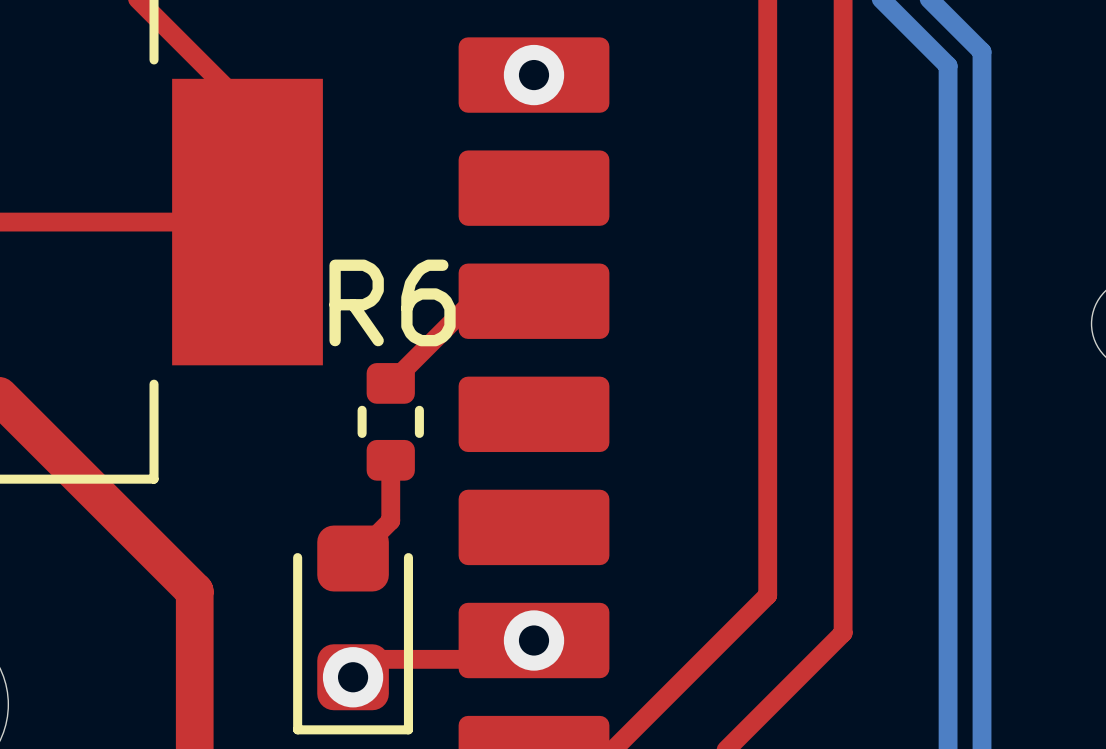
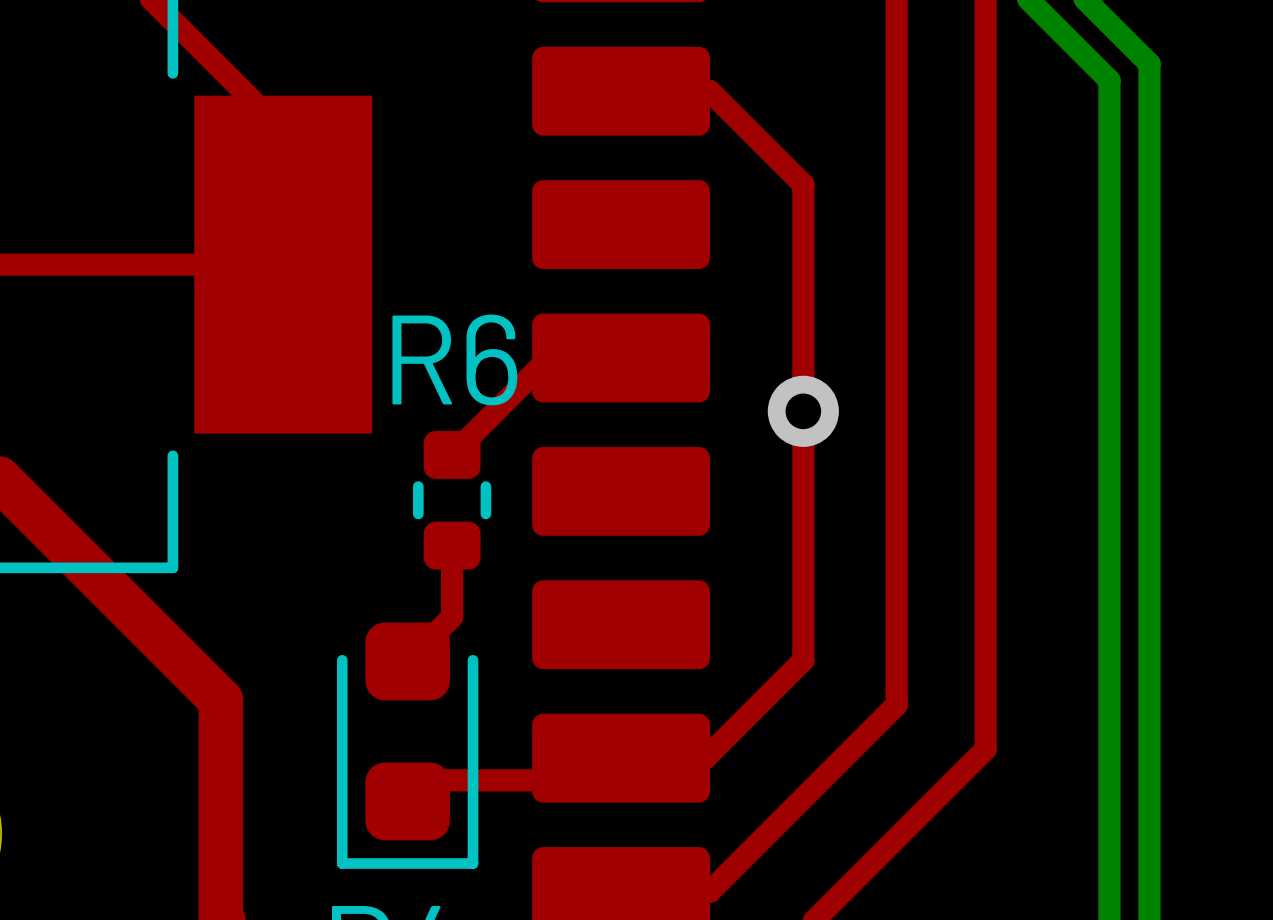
top track: none -> (621, 91) (709, 91) (803, 184) (803, 660) (705, 758) (621, 758)
via: (534, 75) -> none
via: none -> (803, 411)
via: (534, 640) -> none
via: (353, 677) -> none

